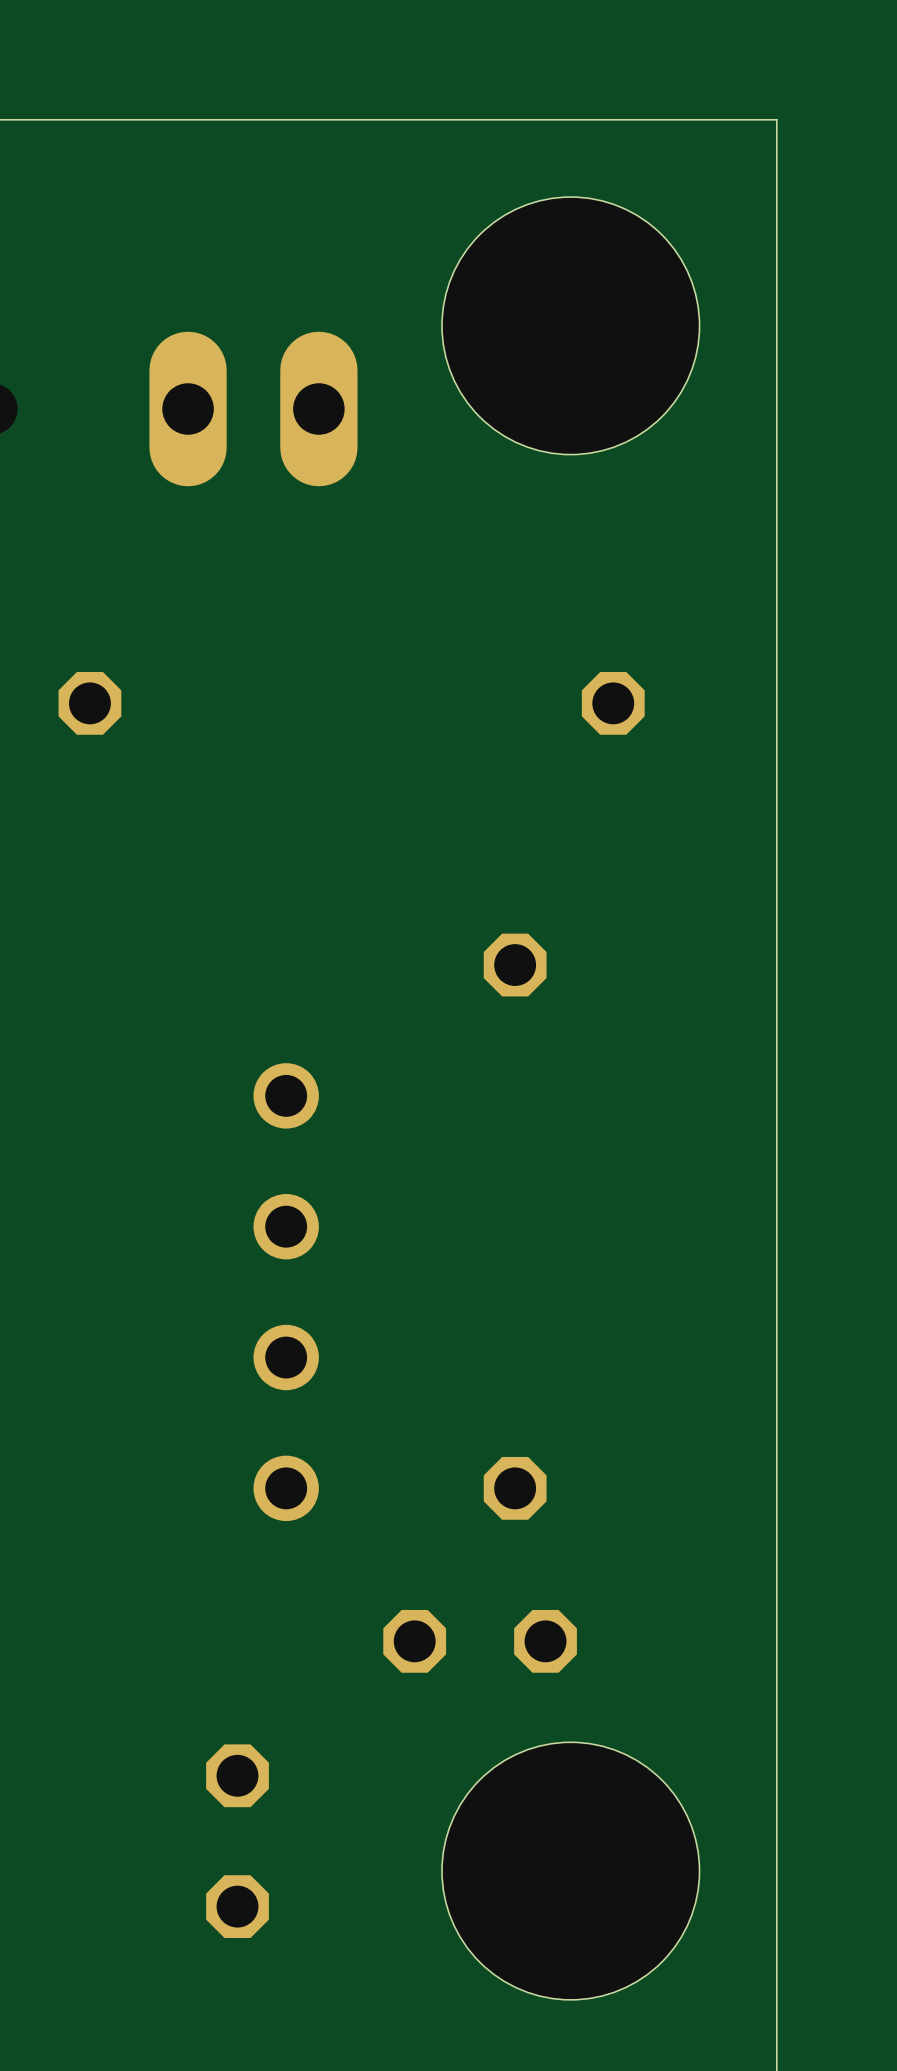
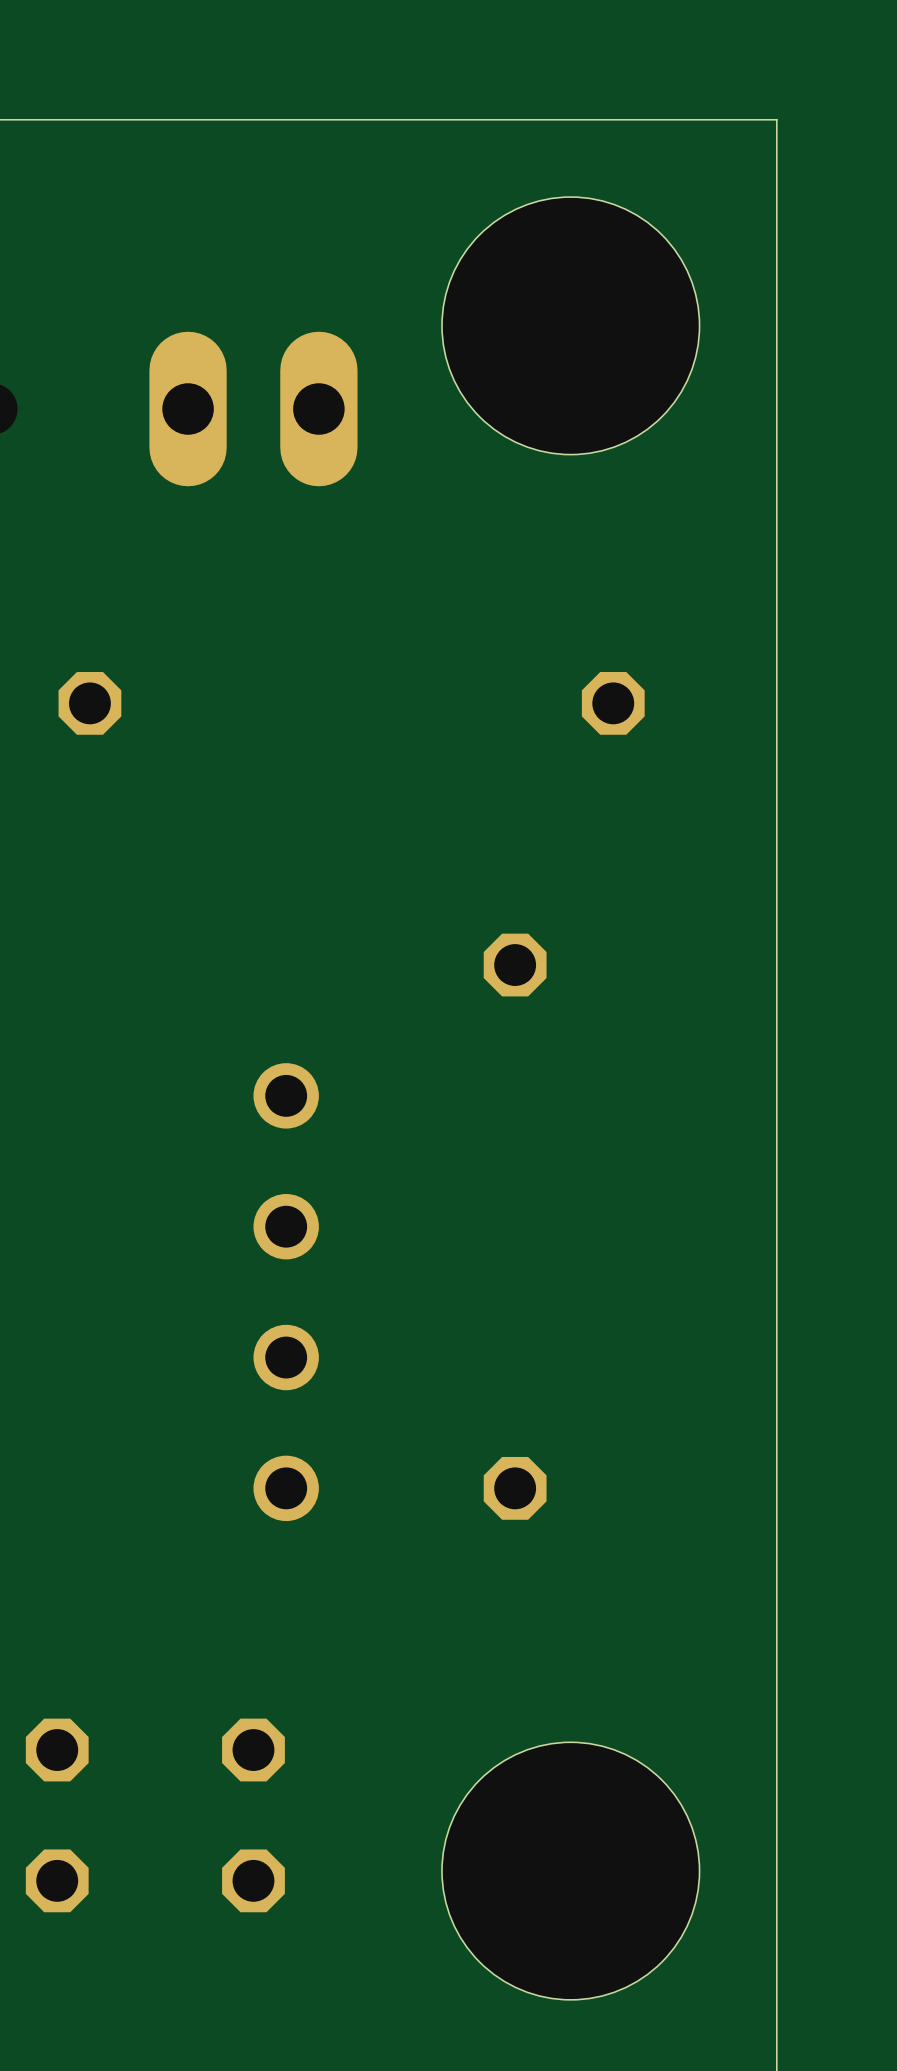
part rotation: 0° (480, 1641) -> 90° clockwise (57, 1815)
part position: (480, 1641) -> (57, 1815)
part position: (237, 1841) -> (253, 1815)

